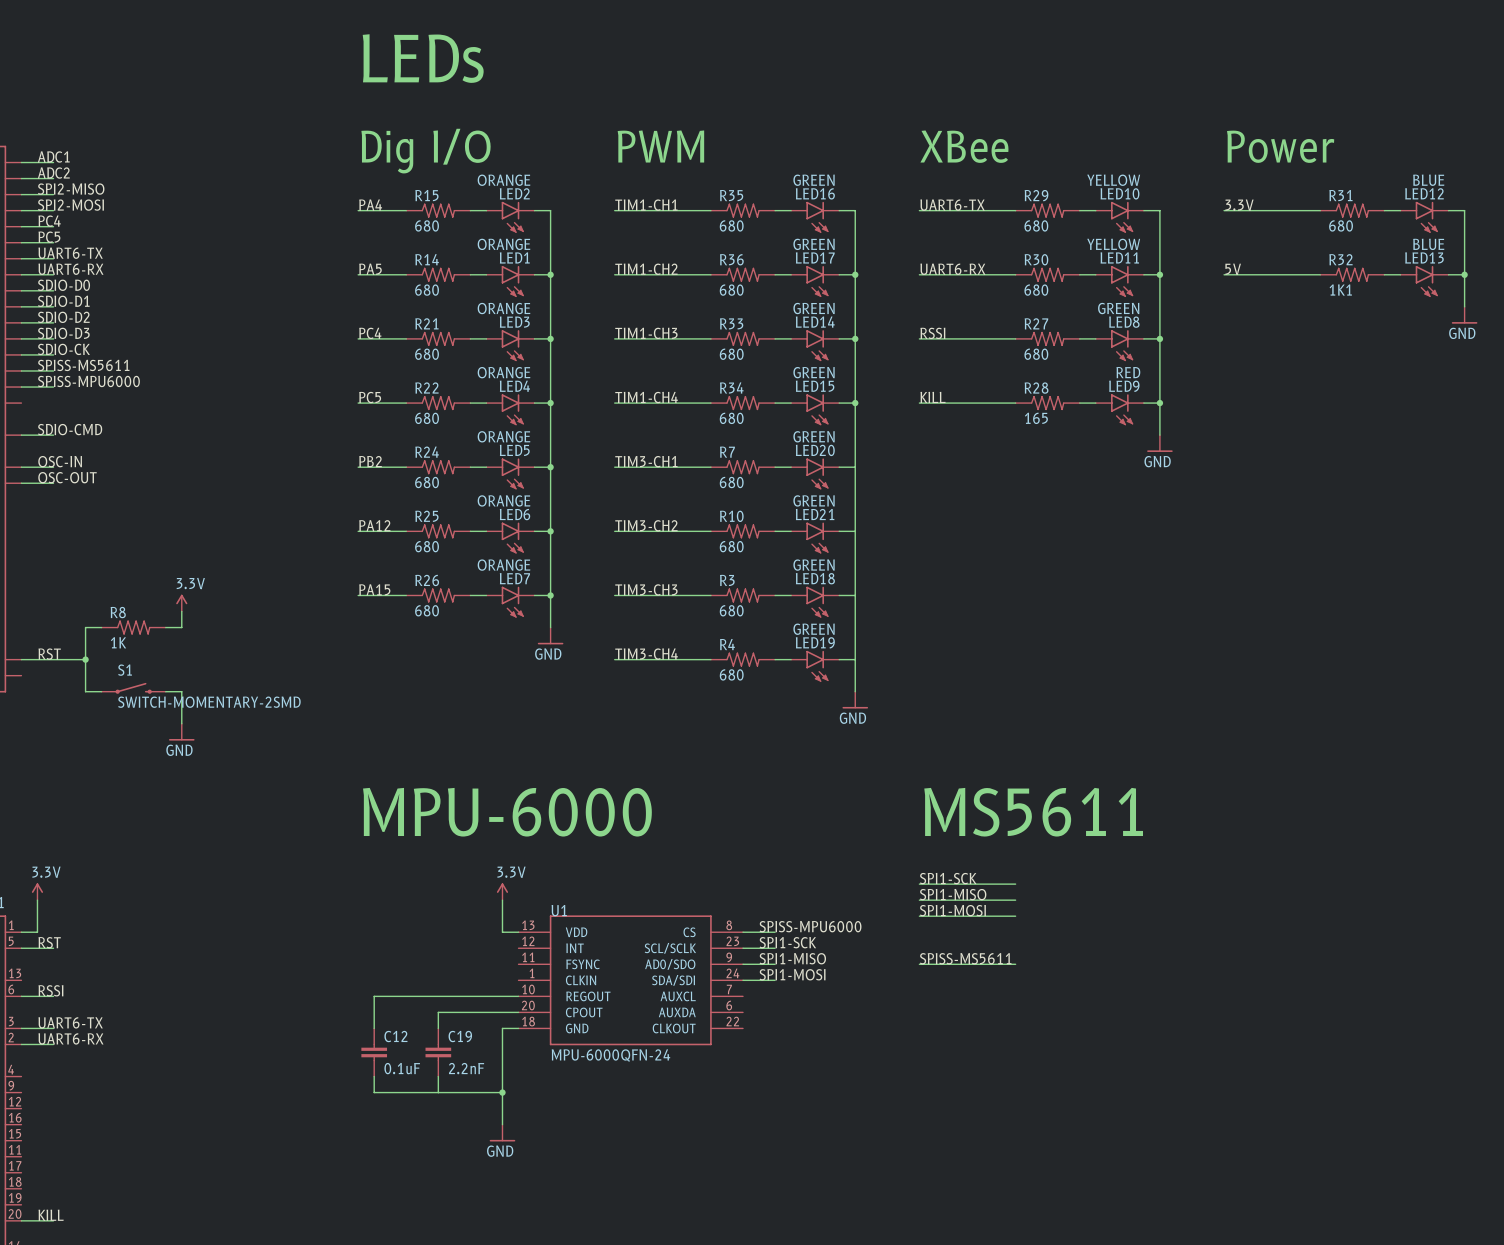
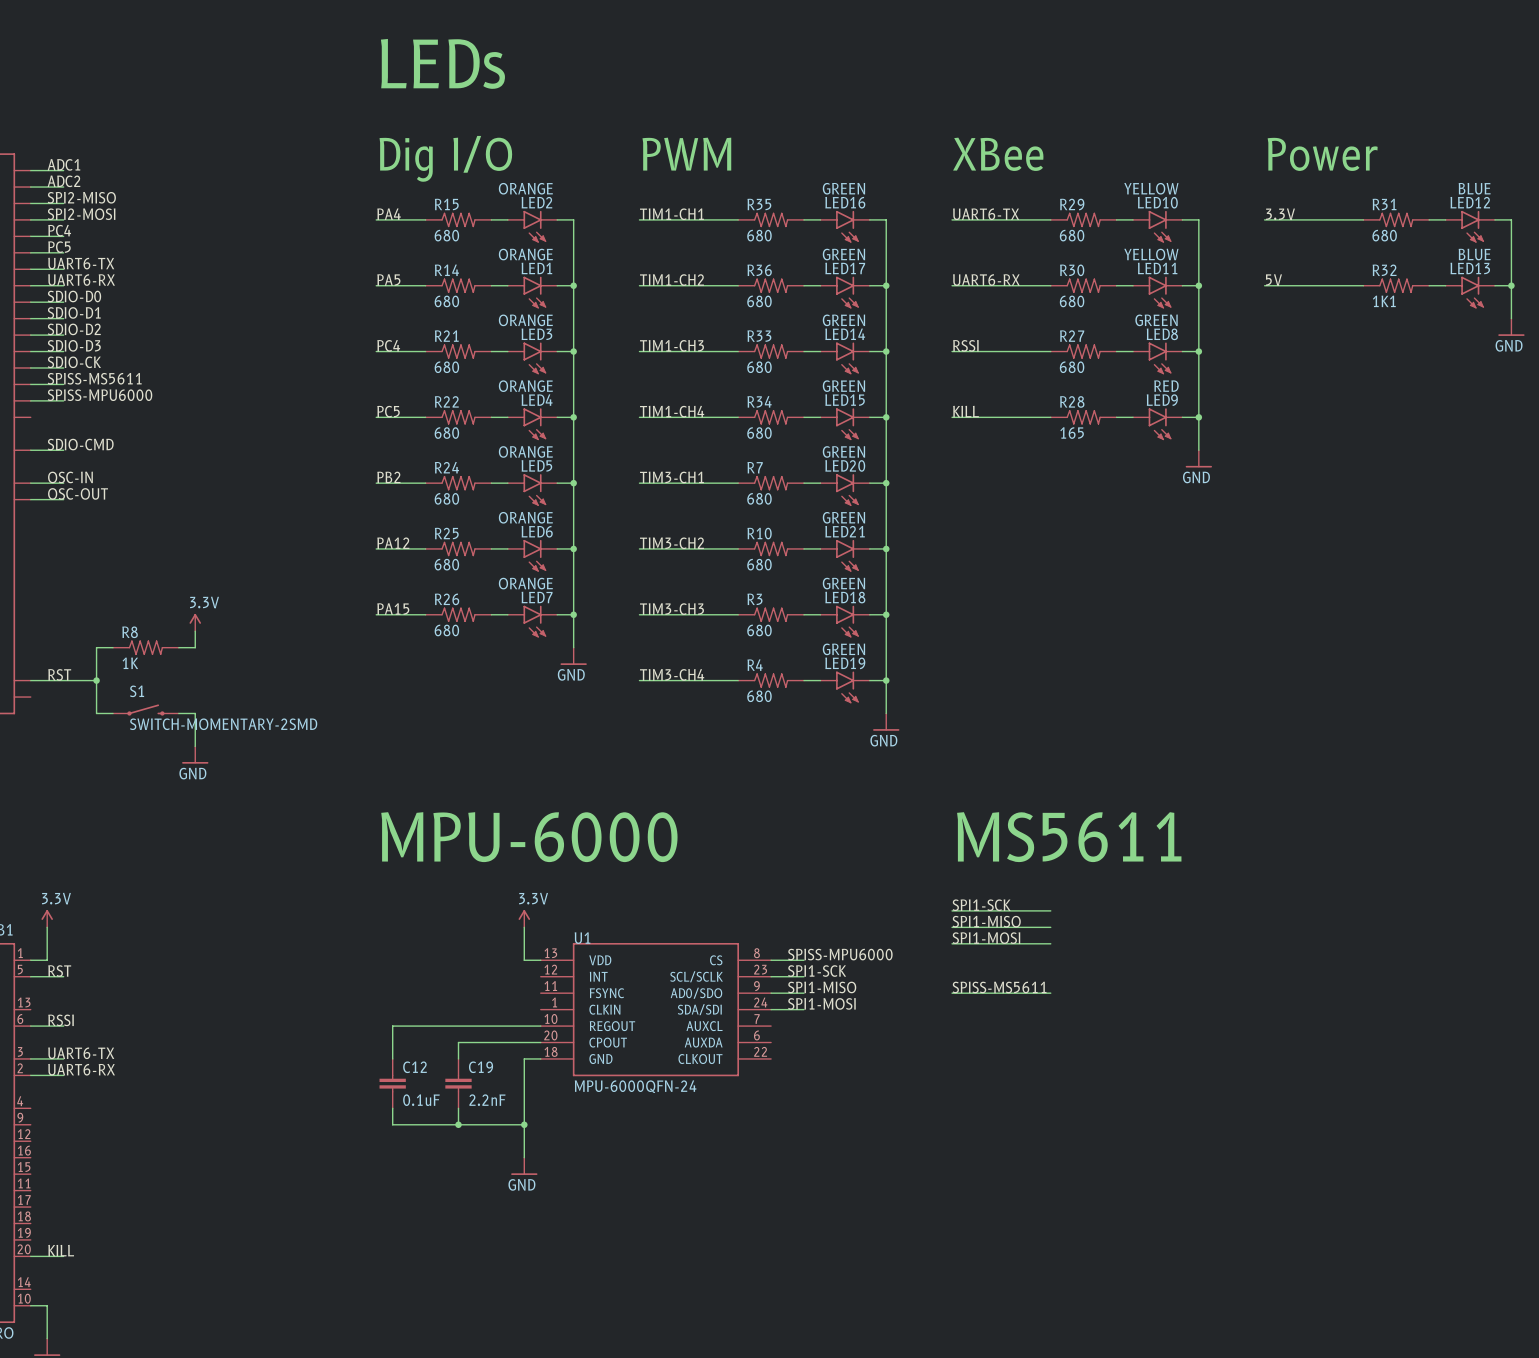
junction: none -> (886, 483)
junction: none -> (886, 548)
junction: none -> (886, 614)
junction: none -> (886, 680)
junction: none -> (458, 1124)

